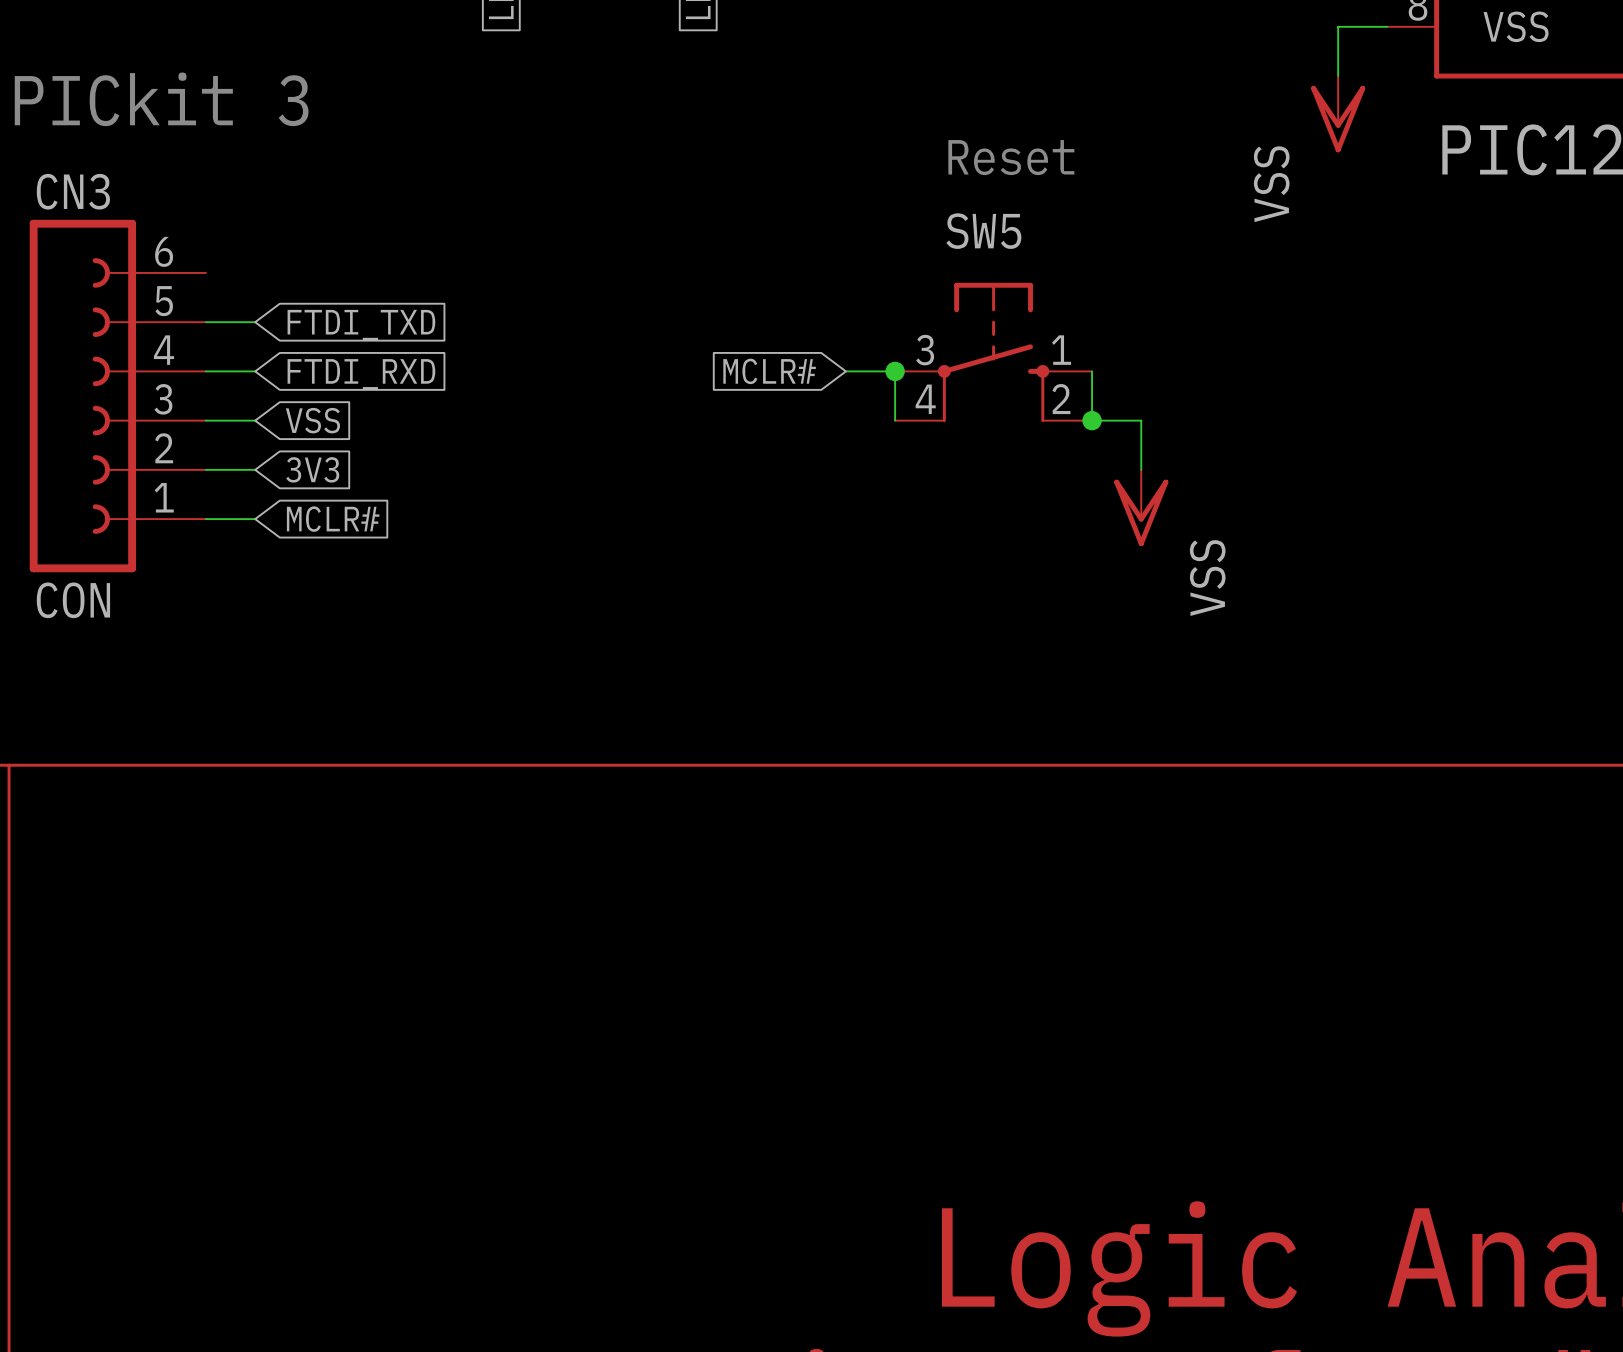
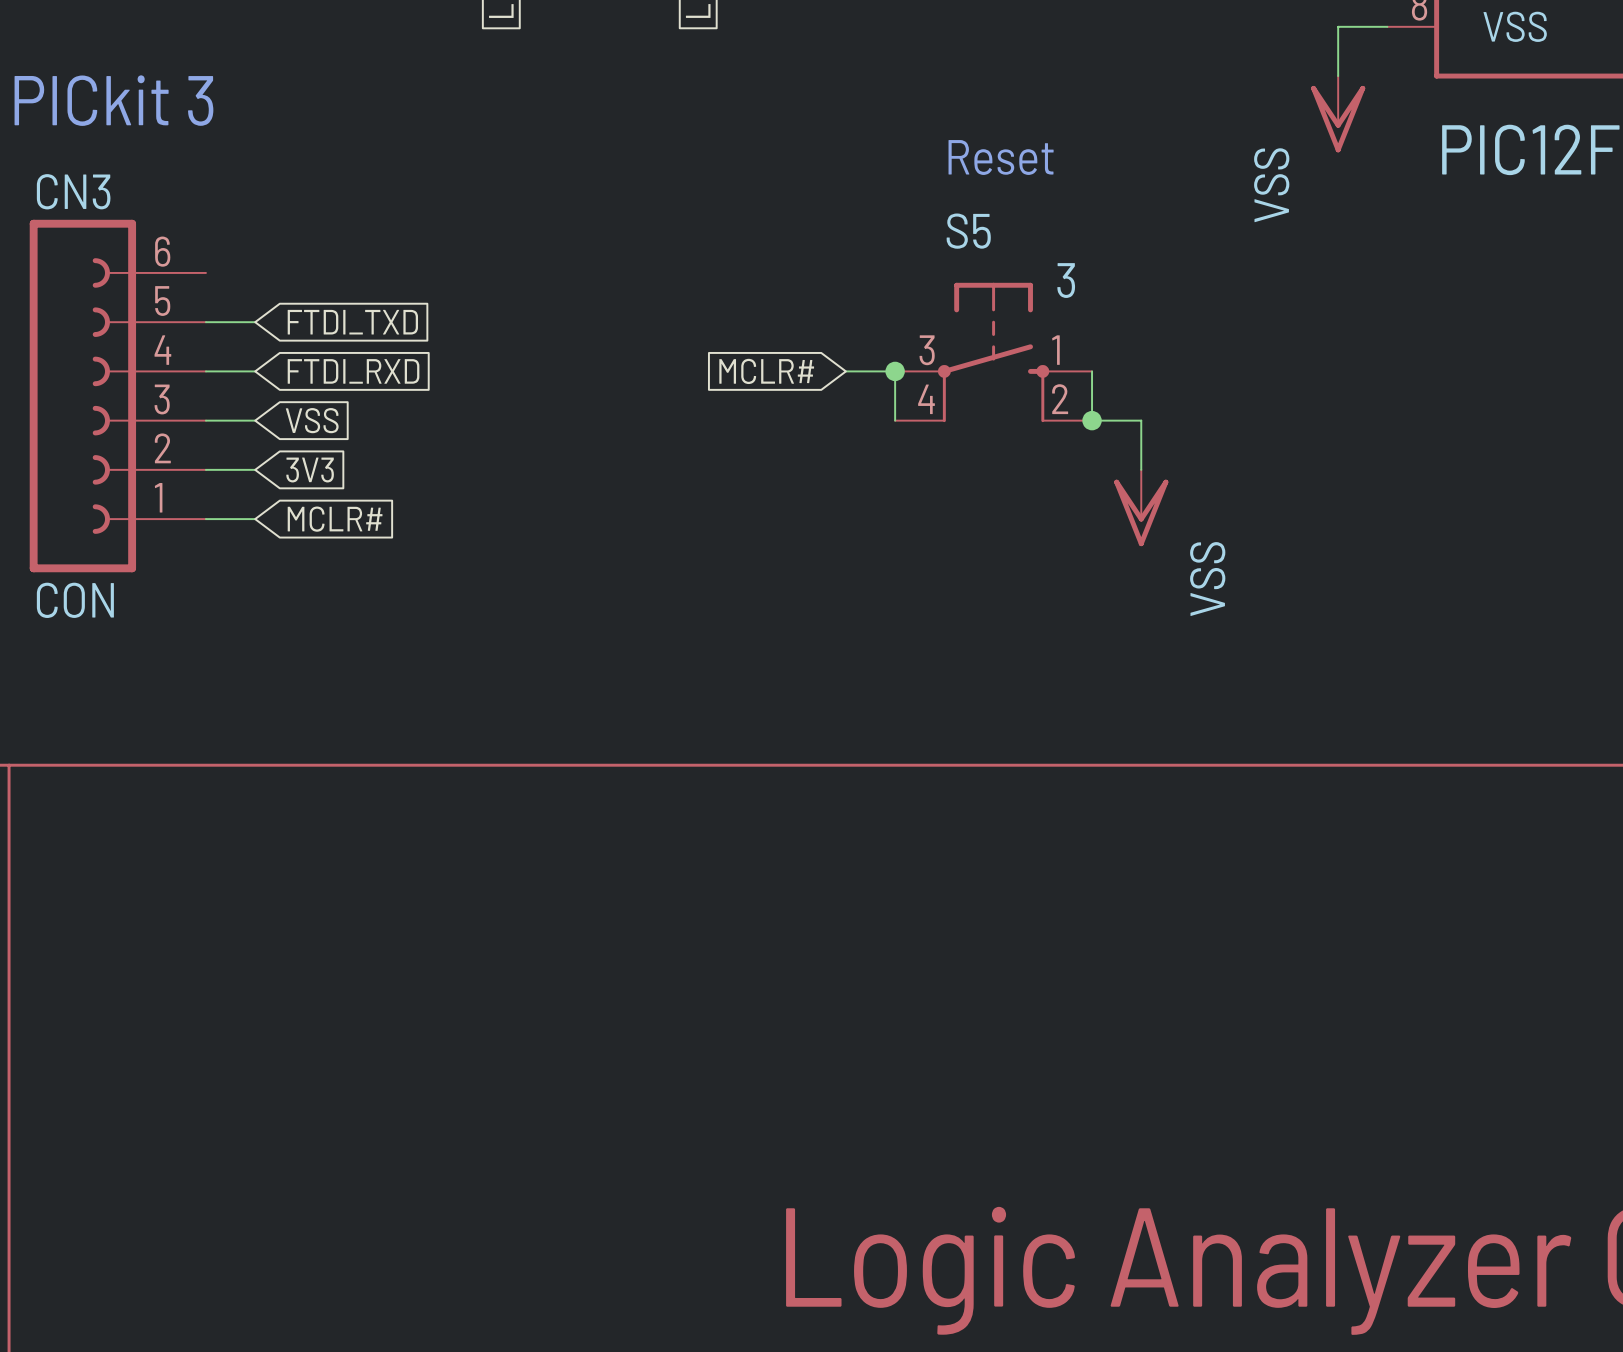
SW5 name: SW5 (983, 231) -> S5 (968, 231)
SW5 value: none -> 3 (1066, 280)

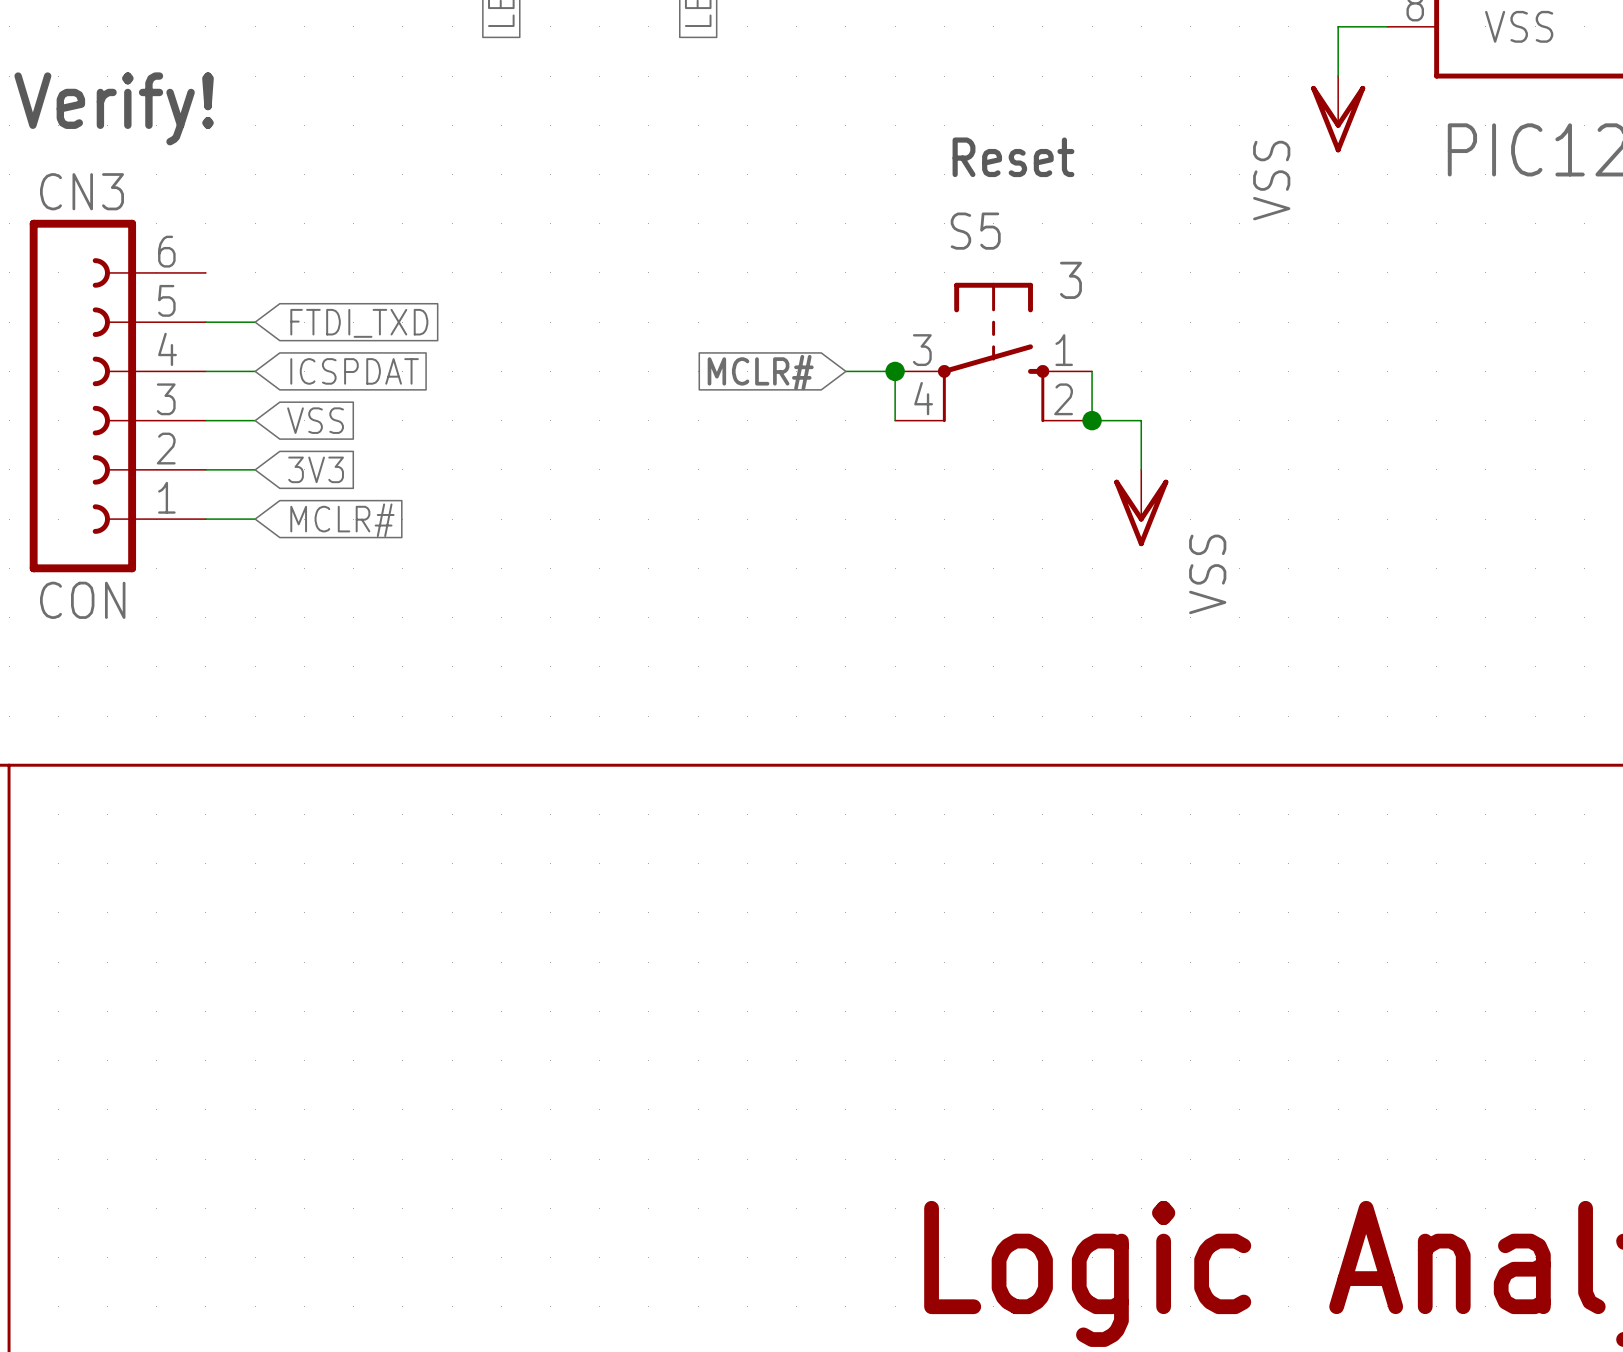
text: PICkit 3 (113, 100) -> Verify! (114, 108)
global label: FTDI_RXD (353, 371) -> ICSPDAT (354, 371)

